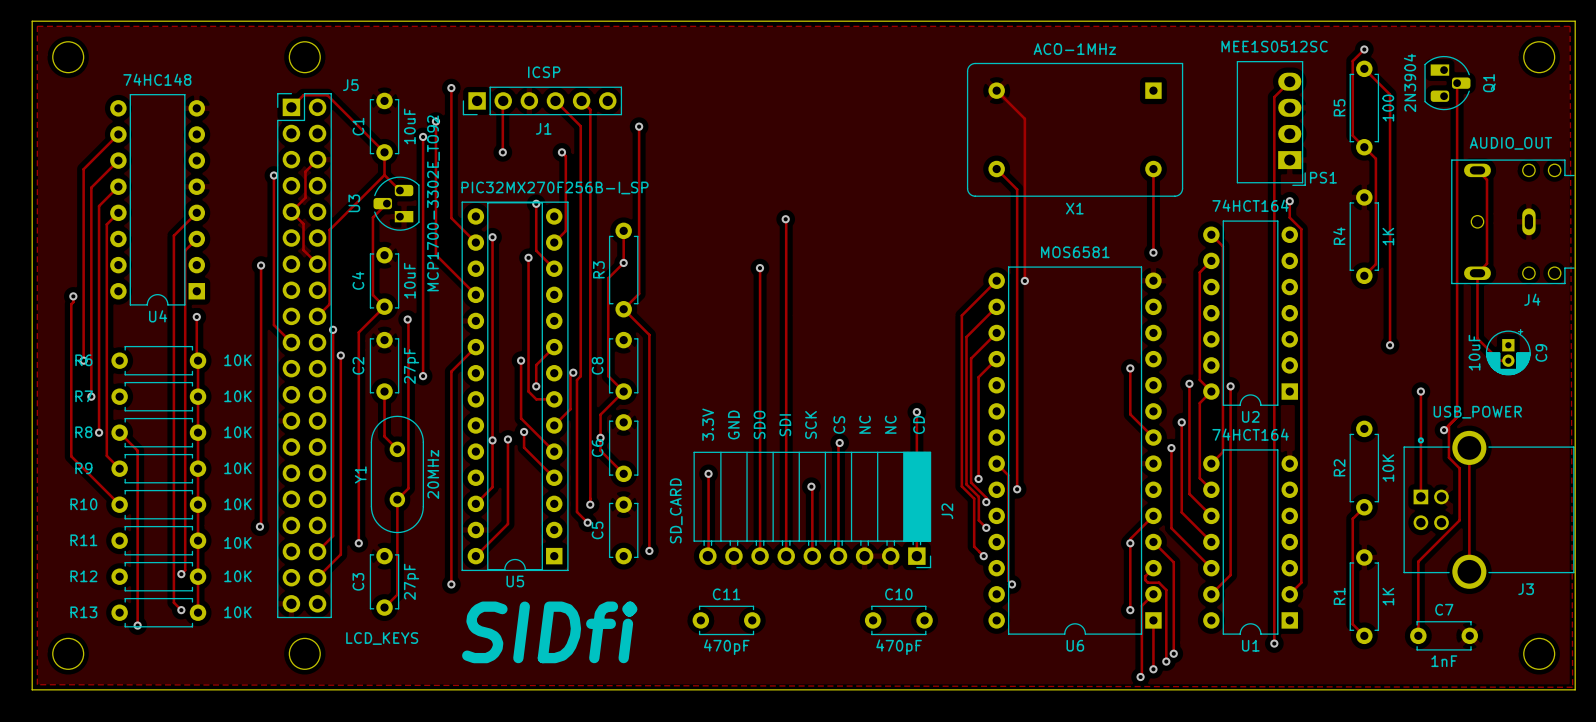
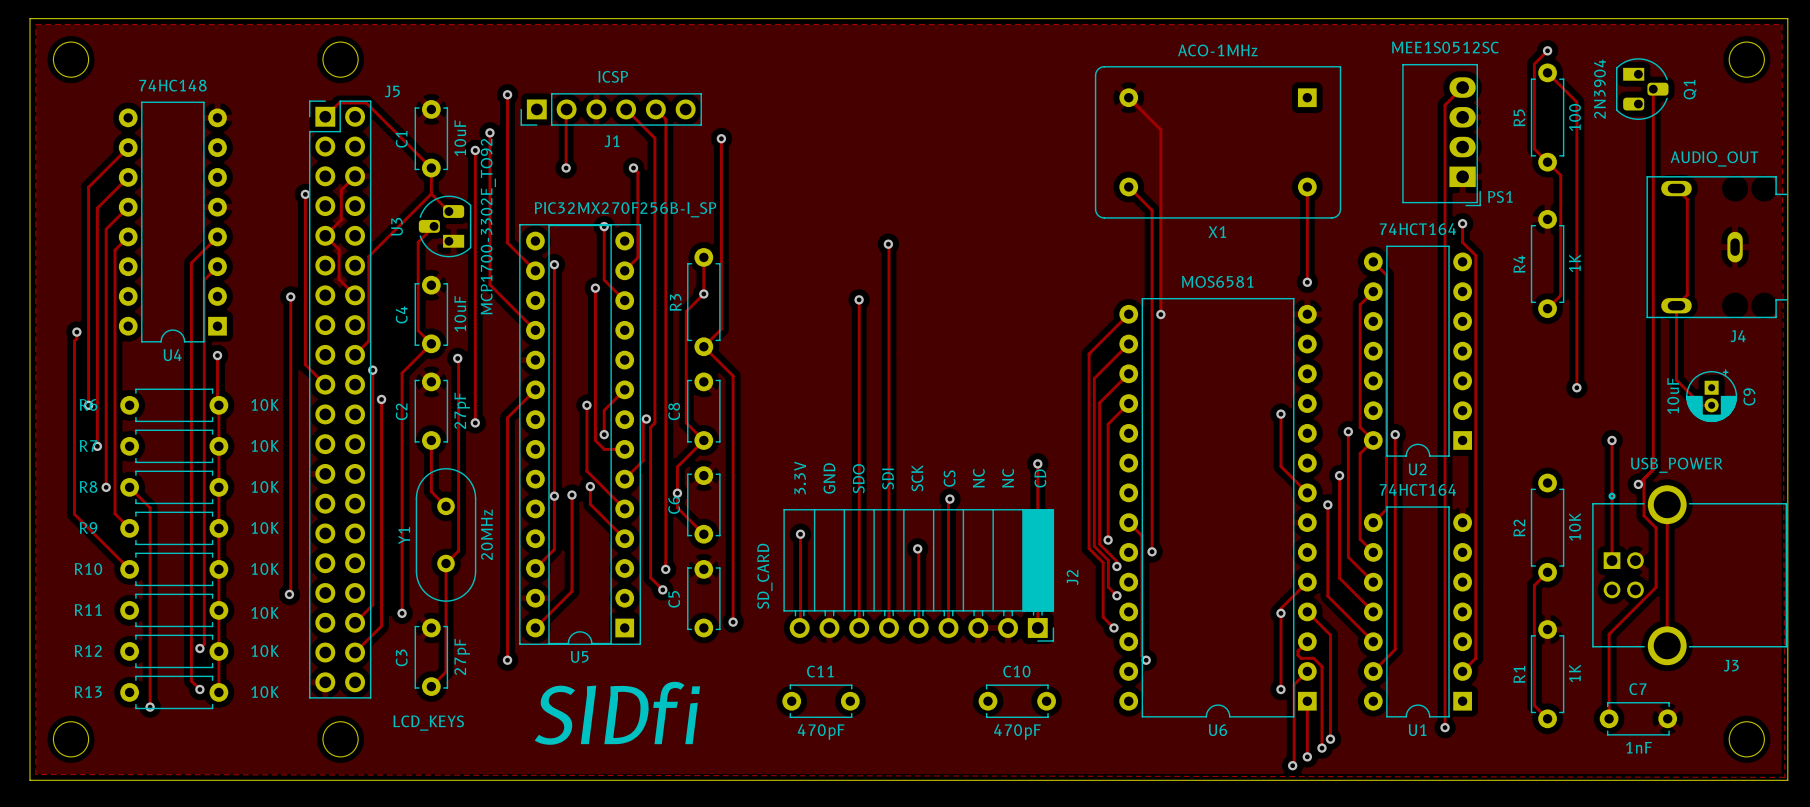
J4 footprint: [1451, 159, 1575, 285] -> [1646, 176, 1788, 319]

